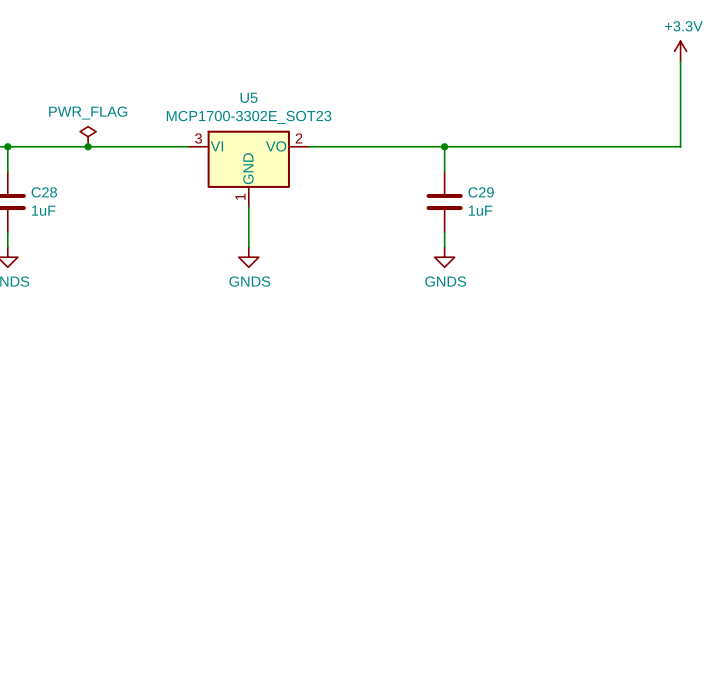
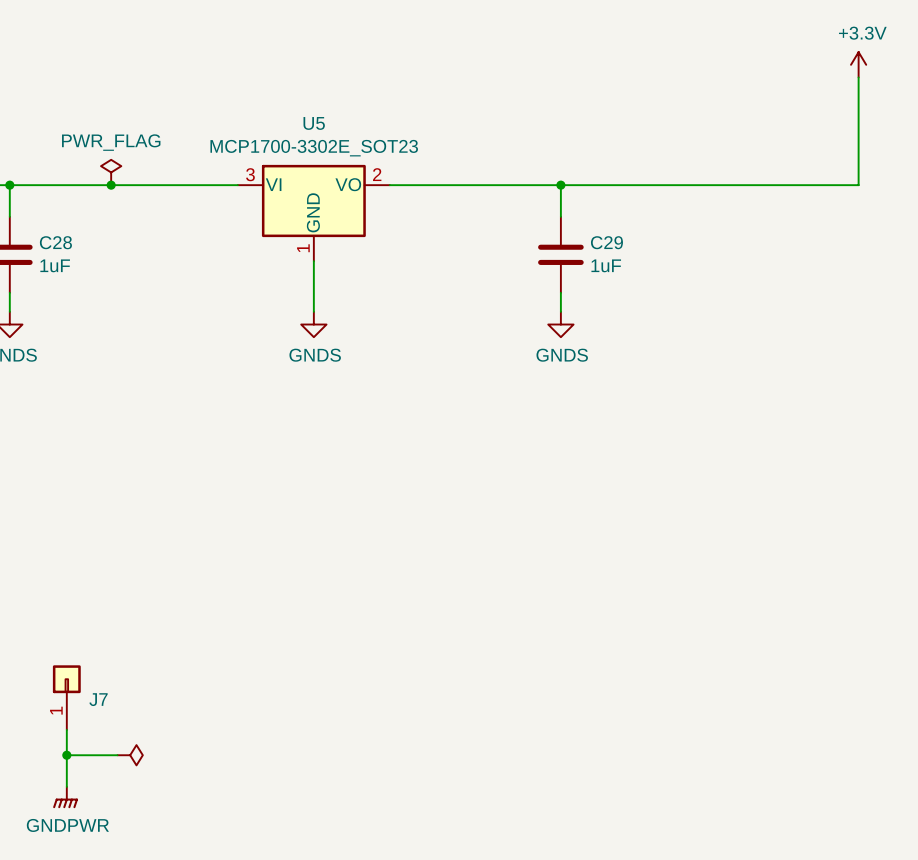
J7: none -> (66, 697)
wire: none -> (66, 729) (66, 786)
wire: none -> (66, 755) (117, 755)
junction: none -> (66, 755)
power symbol: none -> (130, 755)
power symbol: none -> GNDPWR (65, 797)

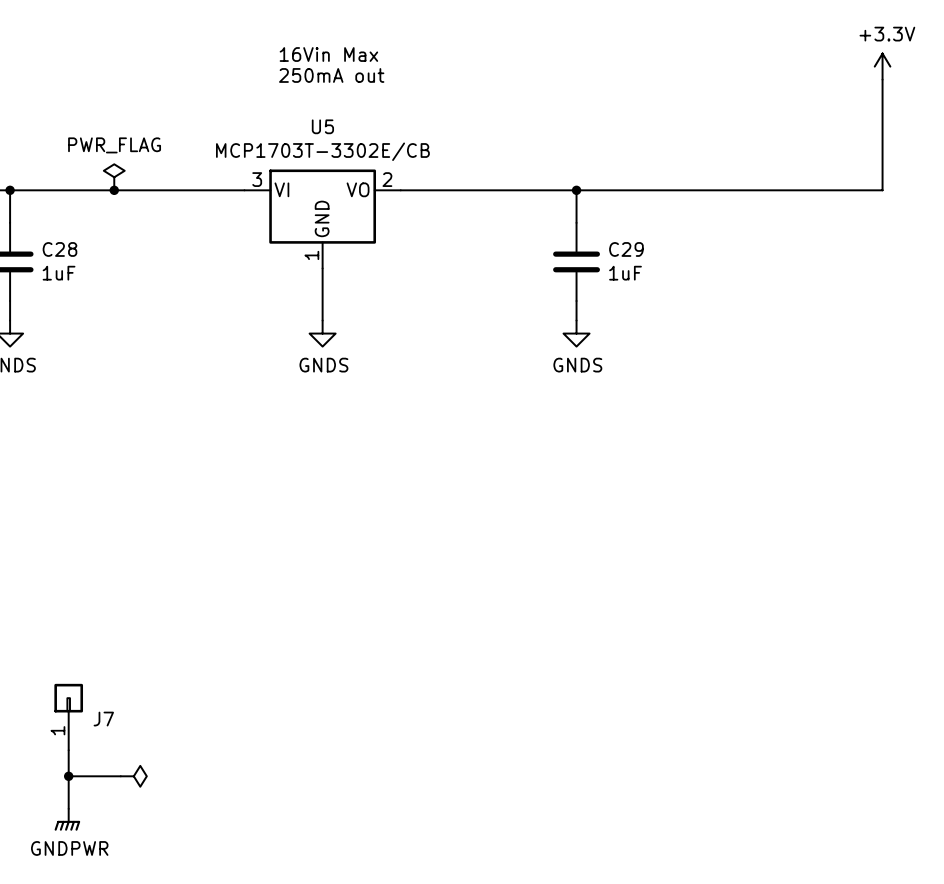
text: none -> 16Vin Max (328, 54)
text: none -> 250mA out (331, 75)
U5 value: MCP1700-3302E_SOT23 (314, 148) -> MCP1703T-3302E/CB (322, 151)

